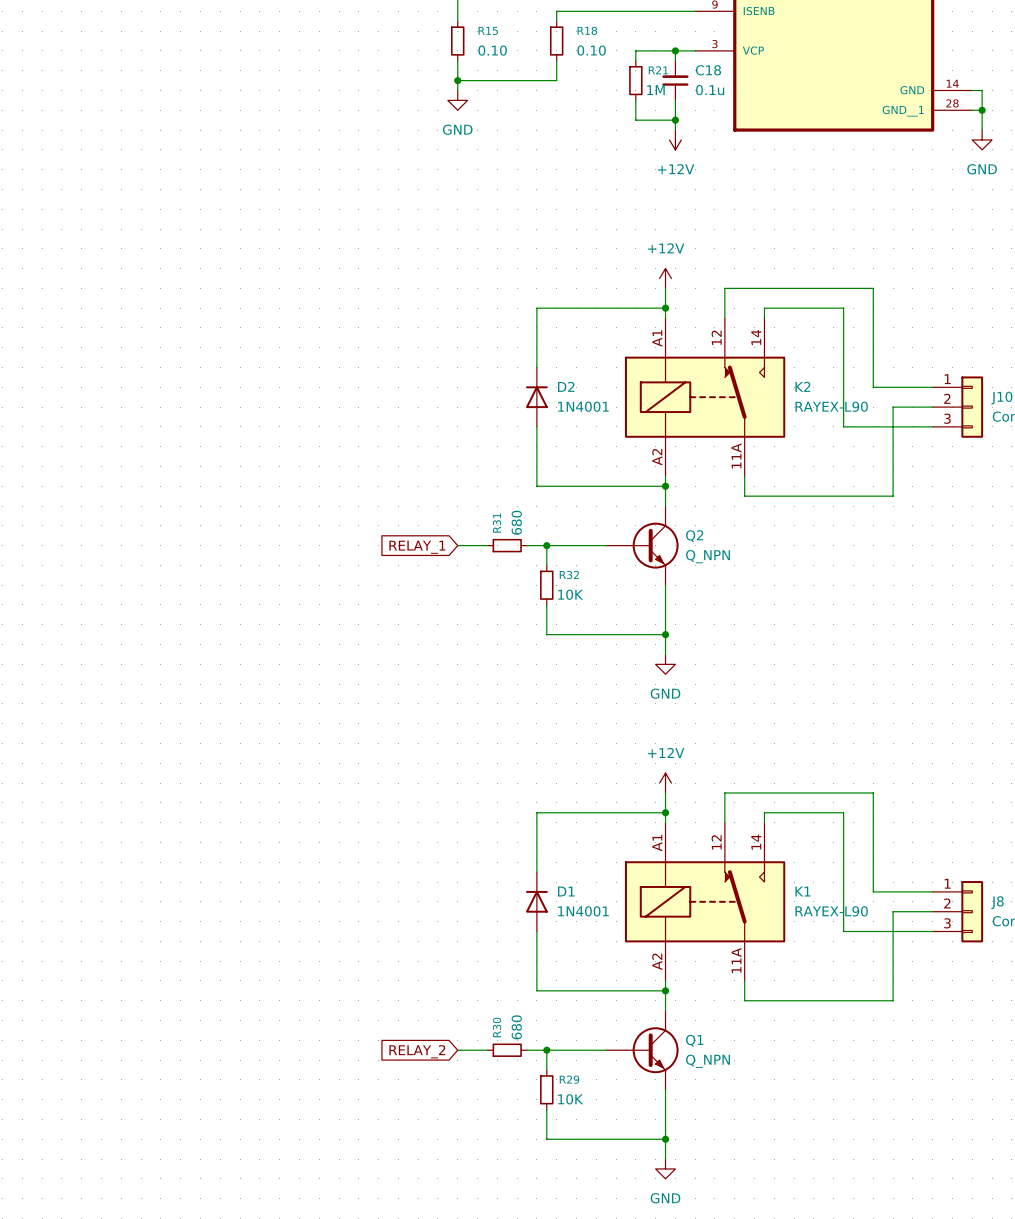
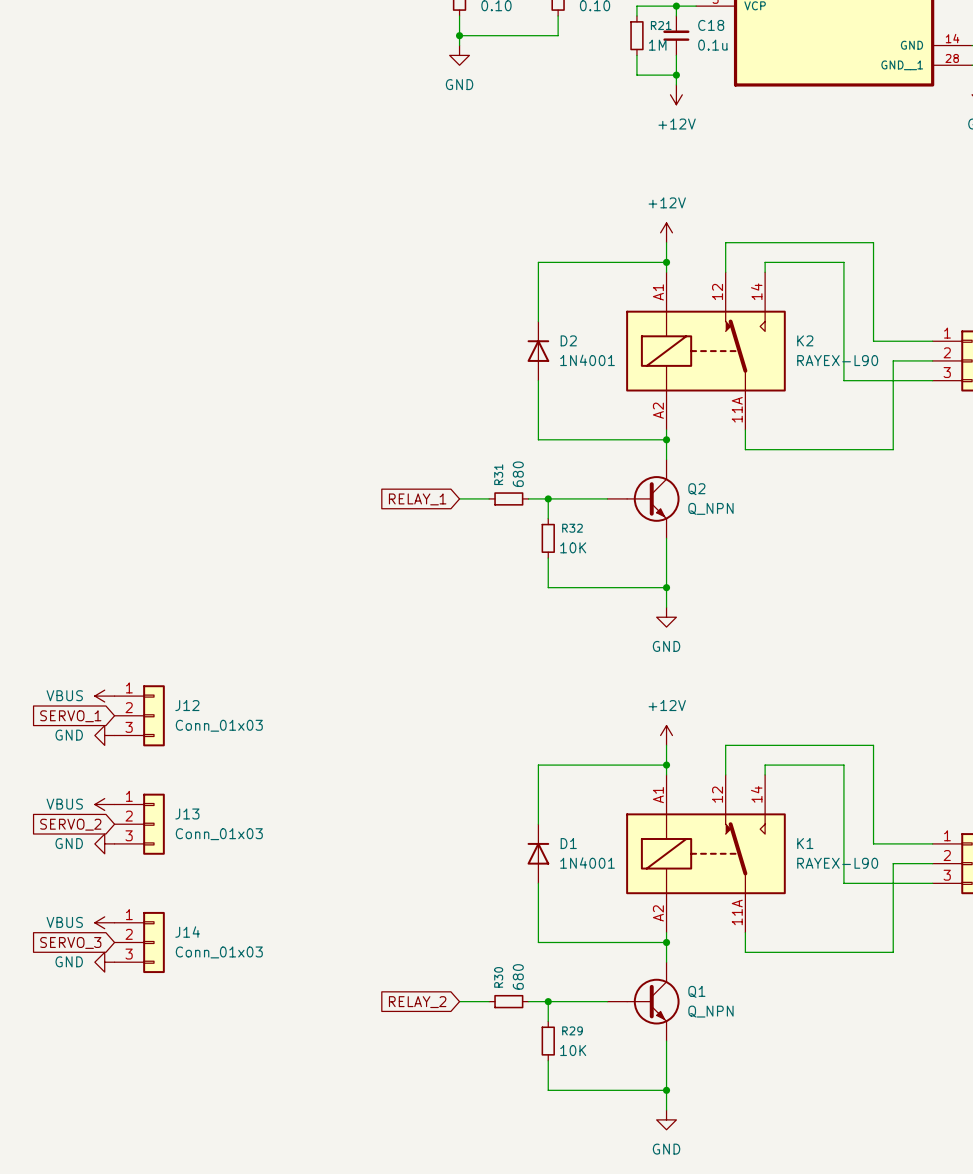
power symbol: none -> VBUS (104, 696)
J12: none -> Conn_01x03 (139, 715)
global label: none -> SERVO_1 (70, 716)
power symbol: none -> GND (104, 735)
power symbol: none -> VBUS (104, 804)
J13: none -> Conn_01x03 (139, 824)
global label: none -> SERVO_2 (70, 824)
power symbol: none -> GND (104, 843)
power symbol: none -> VBUS (104, 922)
J14: none -> Conn_01x03 (139, 942)
global label: none -> SERVO_3 (70, 942)
power symbol: none -> GND (104, 962)

